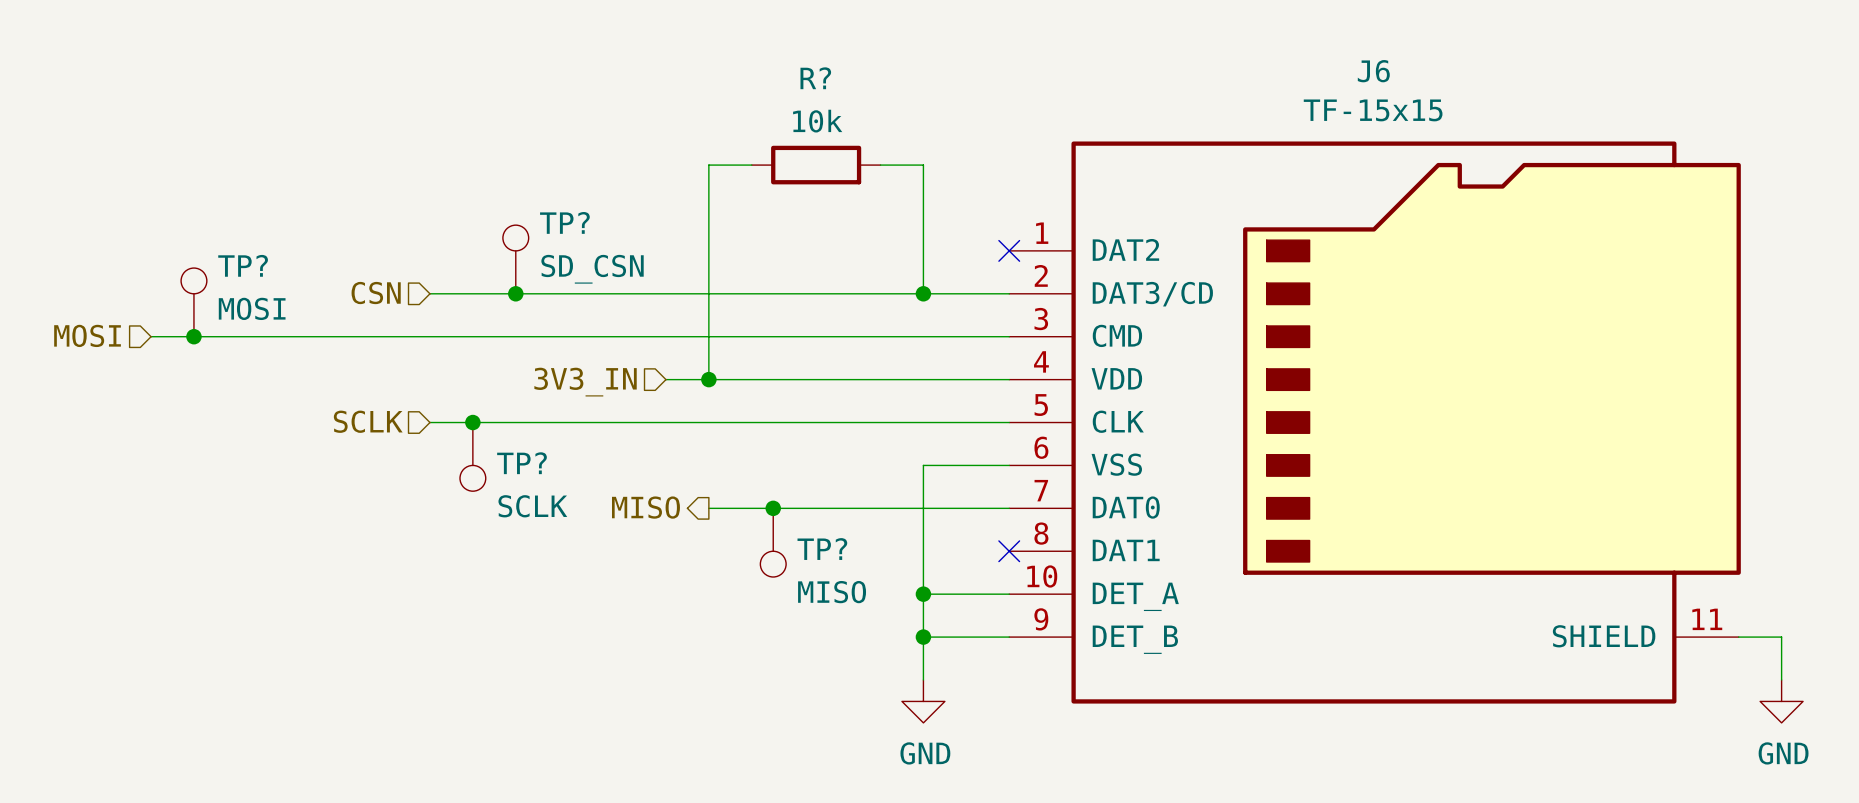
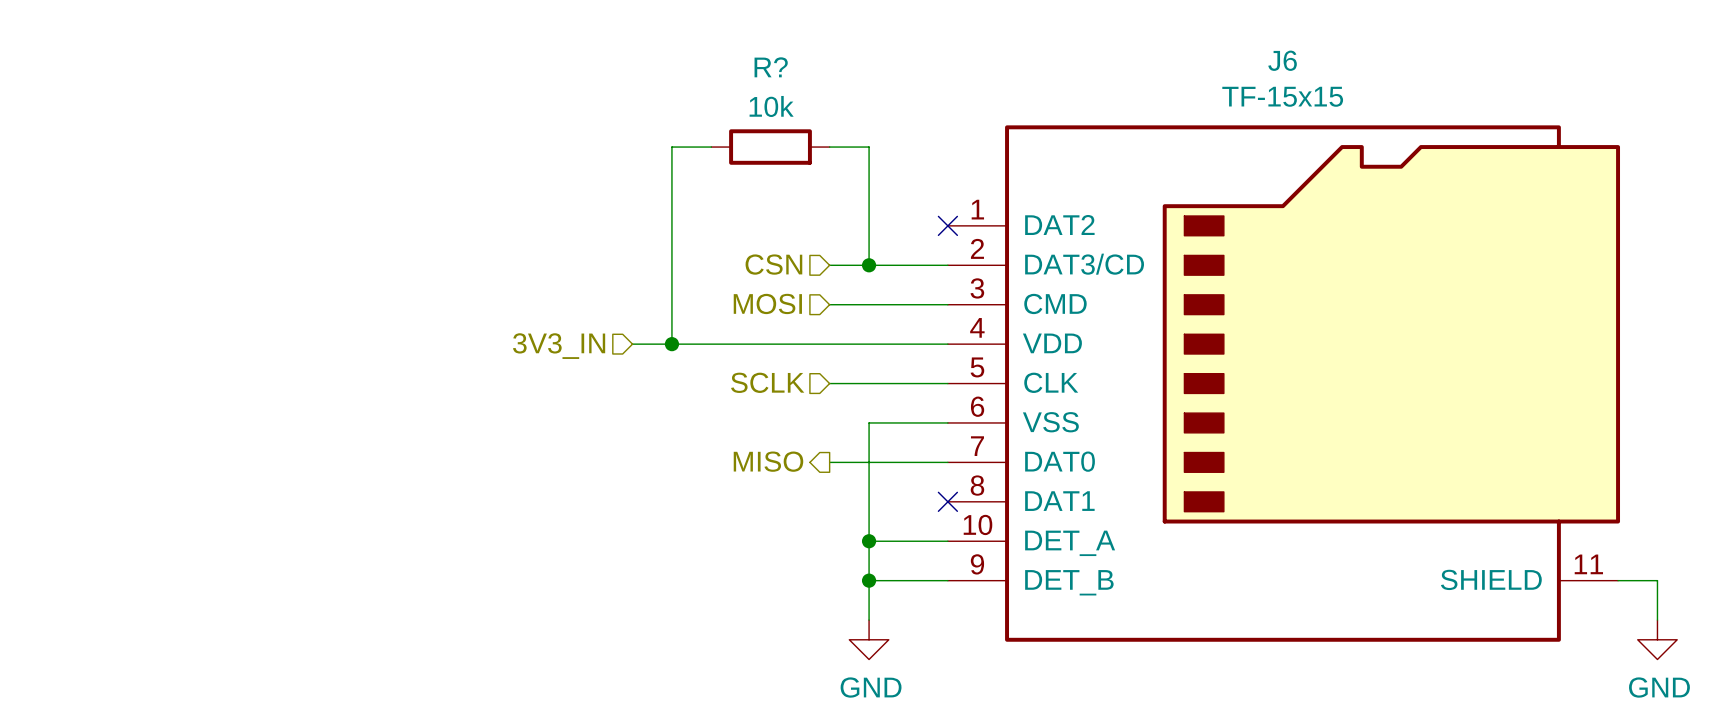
TP?: SD_CSN (515, 259) -> none
hierarchical label: CSN (376, 293) -> none
wire: (429, 293) (880, 293) -> none
junction: (515, 293) -> none
hierarchical label: none -> CSN (773, 264)
TP?: MOSI (193, 302) -> none
hierarchical label: MOSI (87, 335) -> none
hierarchical label: none -> MOSI (767, 303)
wire: (151, 336) (880, 336) -> none
junction: (193, 336) -> none
hierarchical label: SCLK (368, 421) -> none
hierarchical label: none -> SCLK (767, 382)
wire: (429, 422) (880, 422) -> none
junction: (472, 422) -> none
TP?: SCLK (472, 456) -> none
hierarchical label position: MISO (645, 507) -> MISO (768, 461)
wire: (708, 508) (880, 508) -> none
junction: (773, 508) -> none
TP?: MISO (773, 542) -> none

